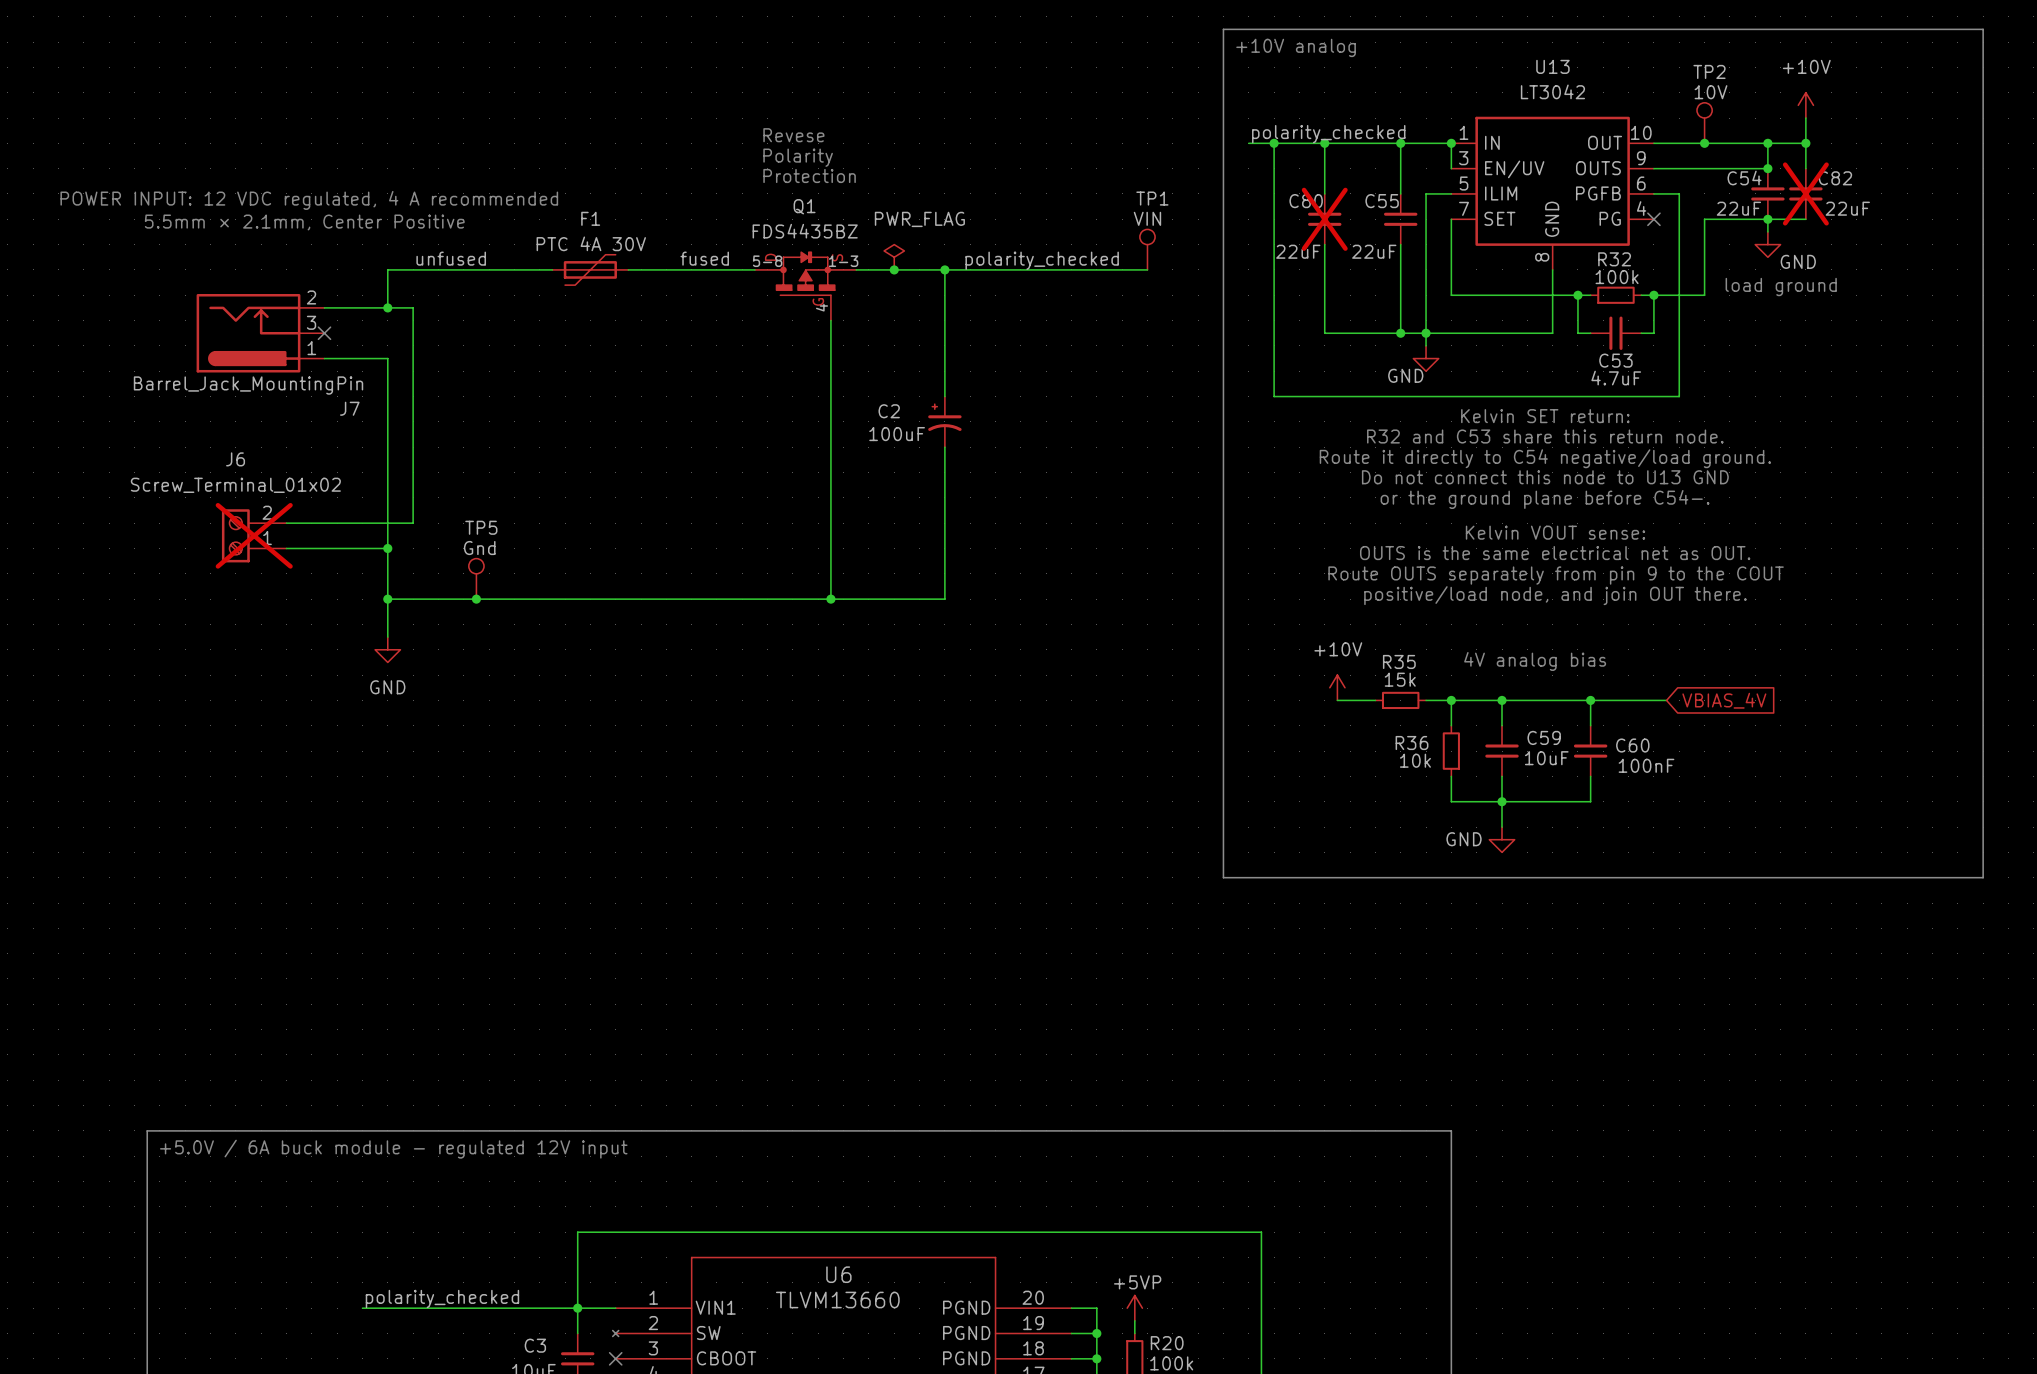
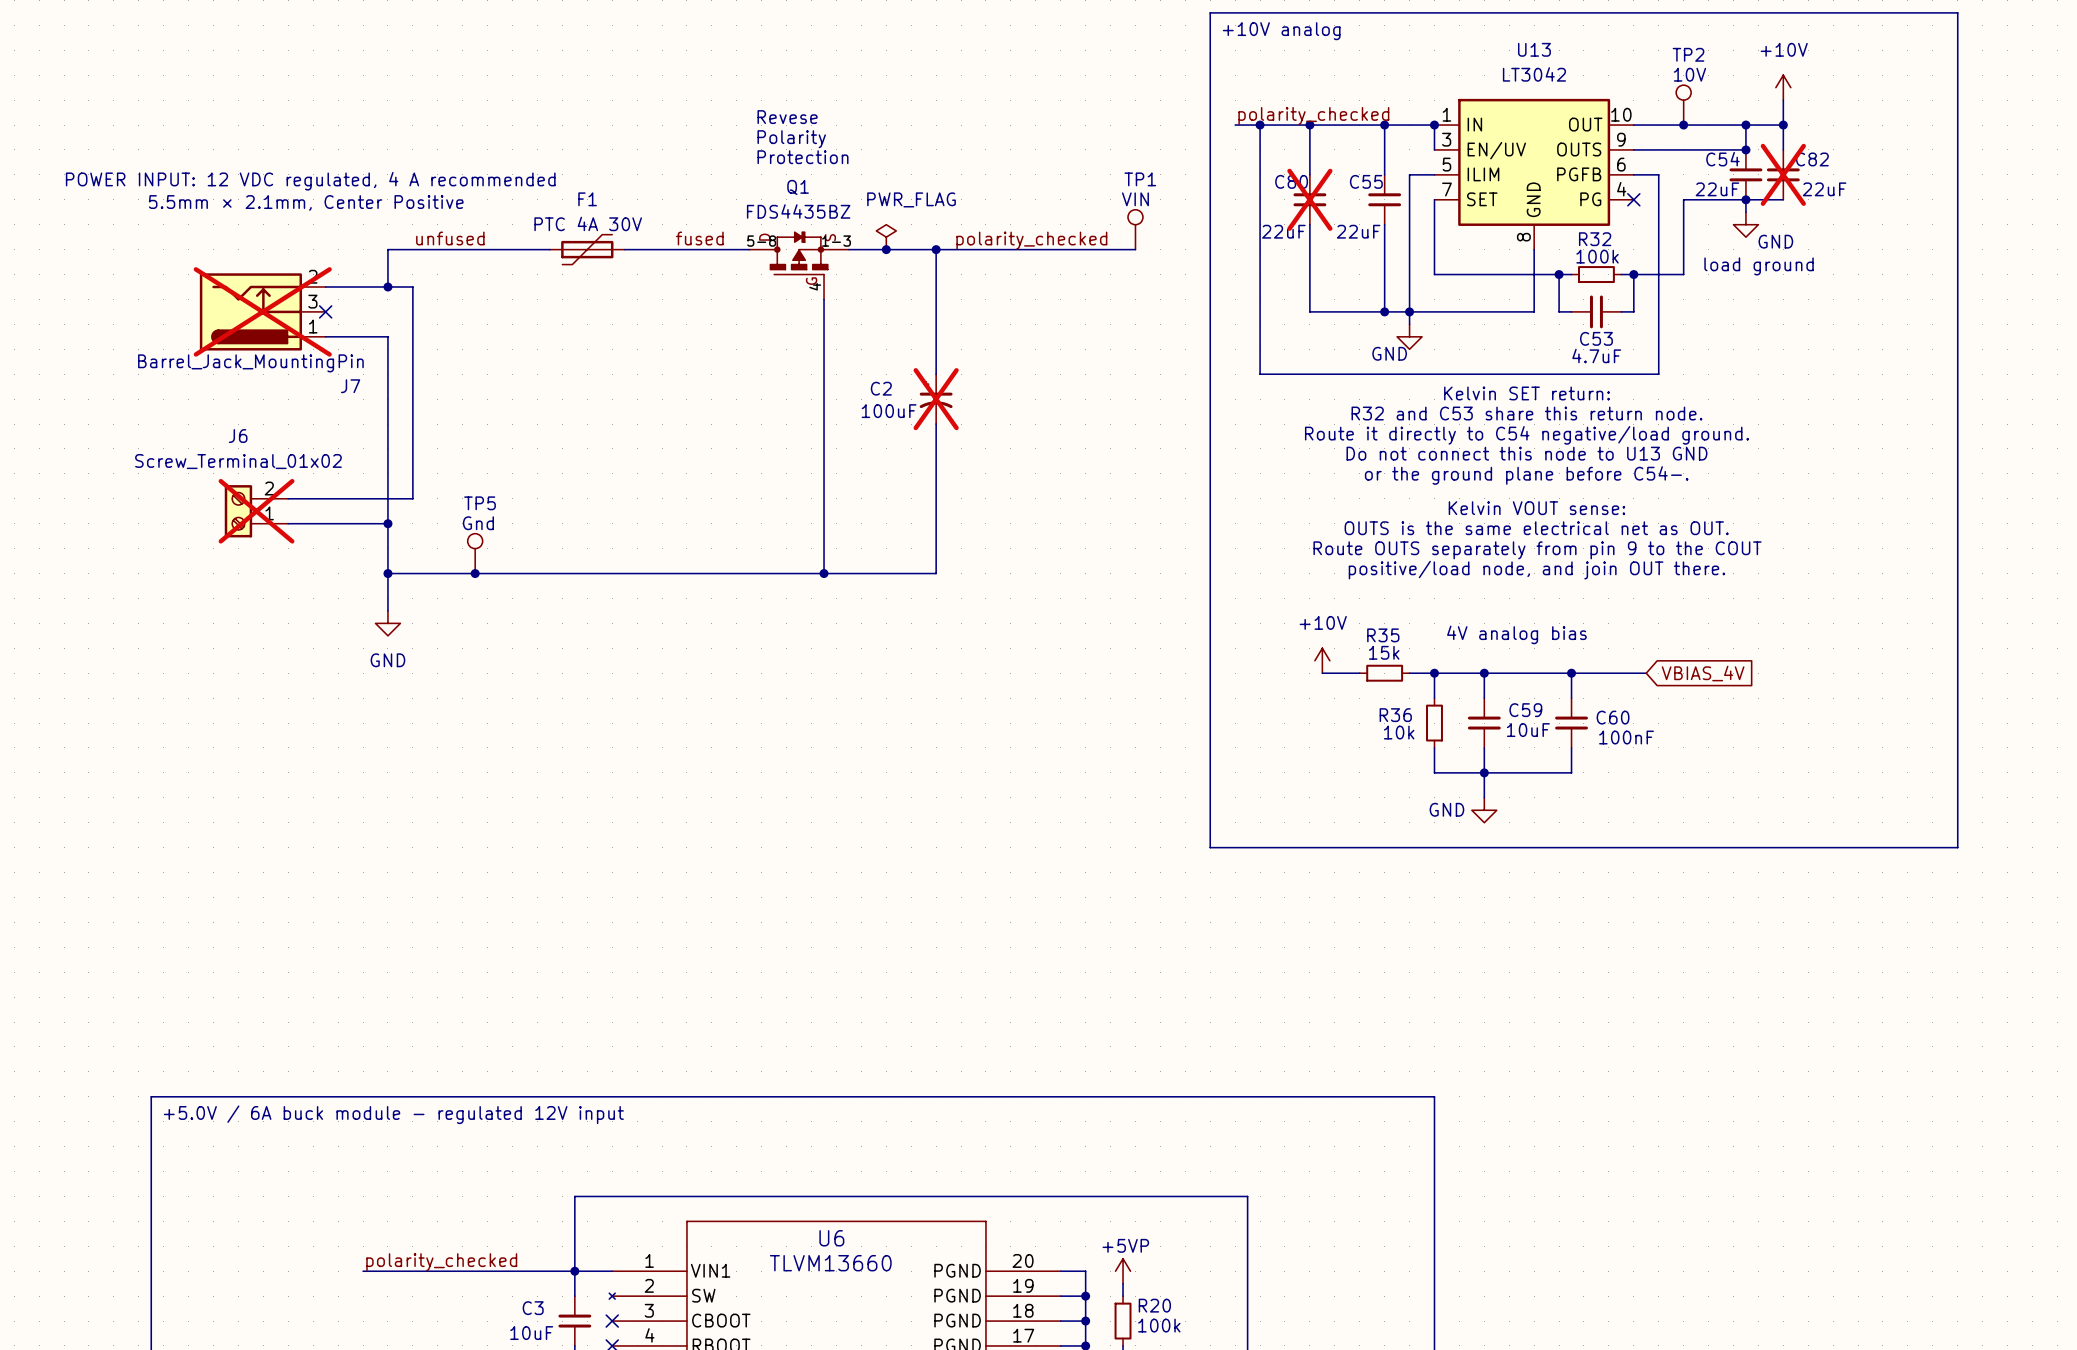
J7 do-not-place cross: none -> (262, 311)
C2 do-not-place cross: none -> (936, 399)

